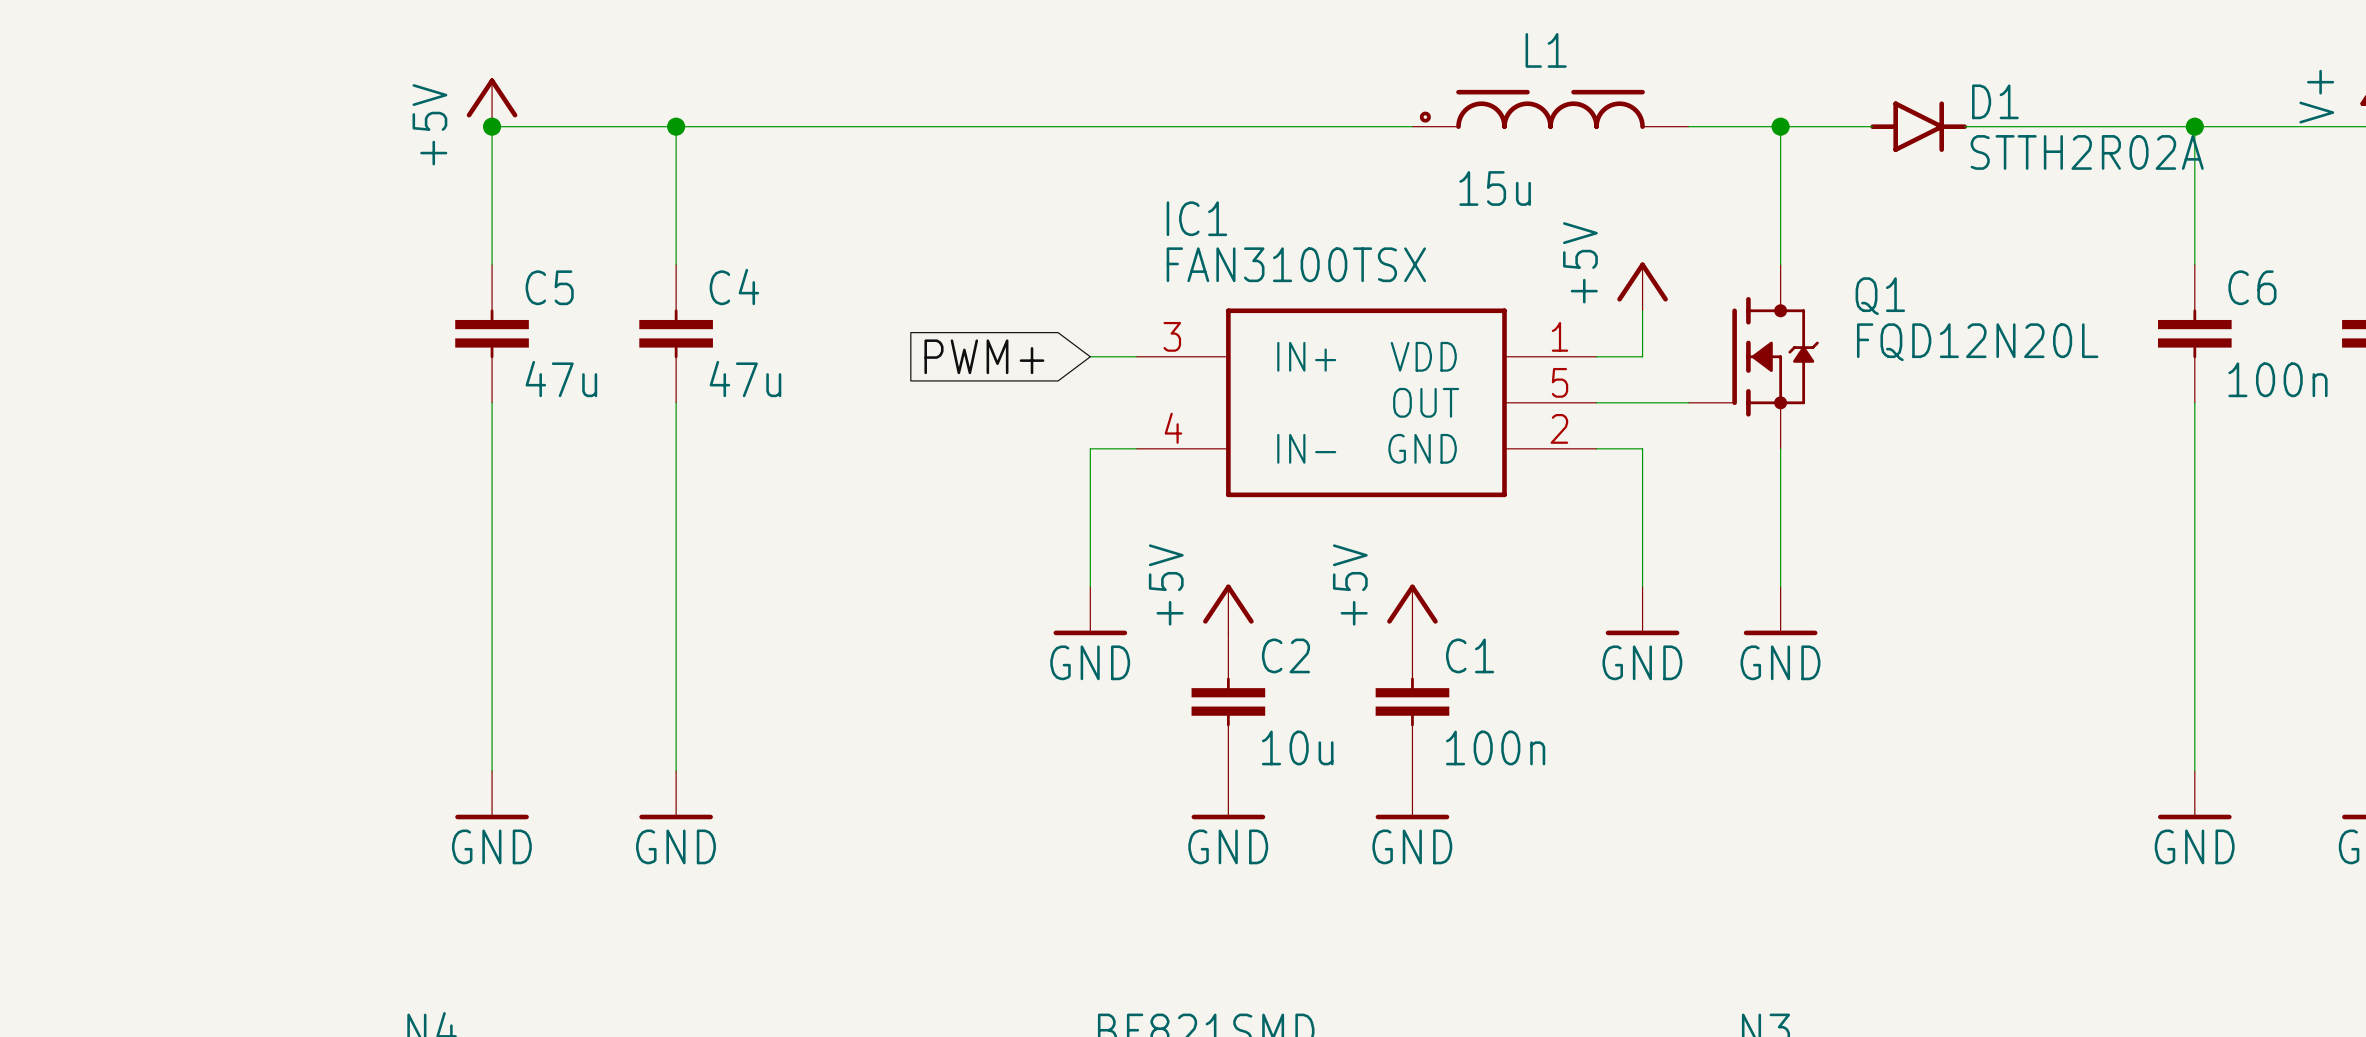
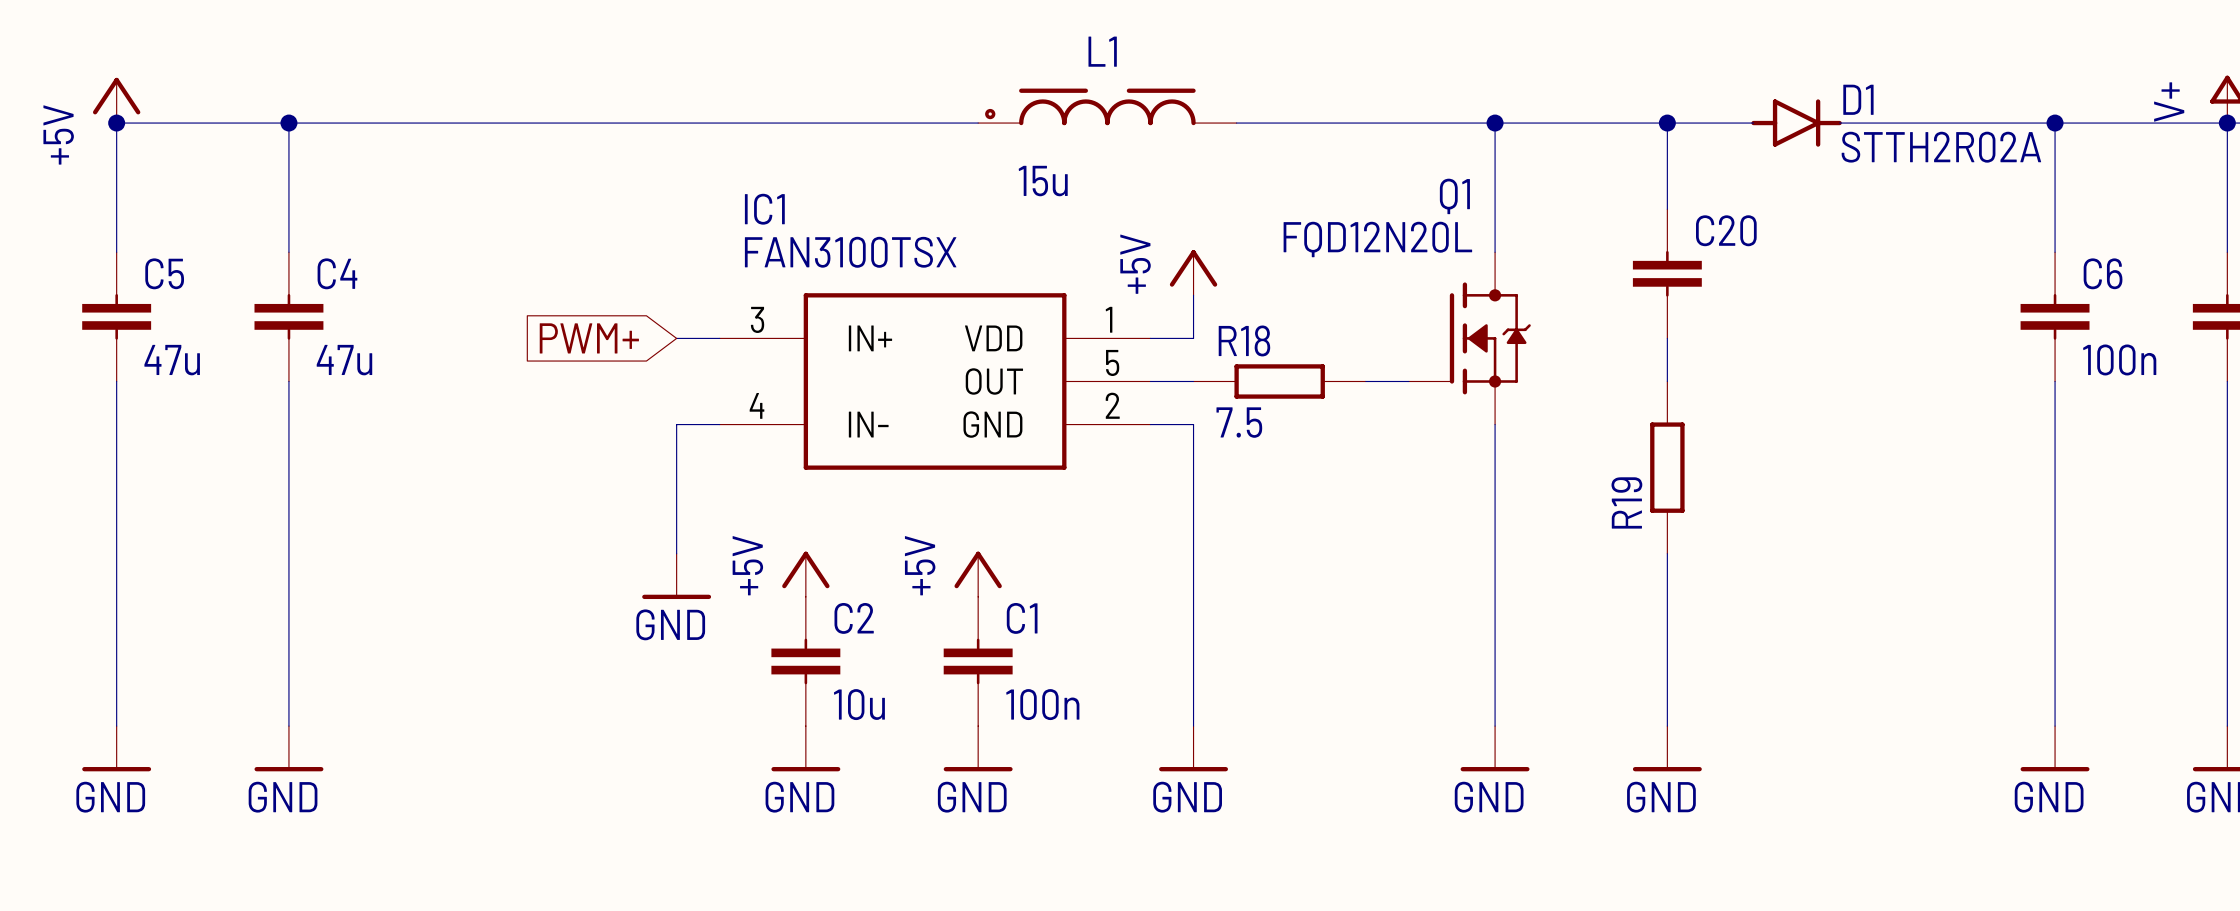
power symbol: none -> +5V (116, 100)
power symbol: +5V (492, 102) -> none
L1 position: (1550, 109) -> (1107, 106)
junction: none -> (116, 123)
junction: none -> (288, 123)
wire: (492, 126) (492, 264) -> (461, 123) (116, 123) (116, 252)
junction: (492, 126) -> none
wire: (676, 126) (676, 264) -> (288, 123) (288, 252)
junction: (676, 126) -> none
wire: (1044, 126) (1320, 126) -> (1322, 123) (1581, 123)
wire: none -> (1495, 123) (1495, 252)
junction: none -> (1495, 123)
power symbol: none -> +5V (1193, 272)
power symbol: +5V (1642, 286) -> none
C20: none -> (1667, 273)
Q1 name position: Q1 (1880, 296) -> Q1 (1454, 196)
wire: (1642, 310) (1642, 356) (1596, 356) -> (1193, 295) (1193, 338) (1150, 338)
C5 position: (492, 333) -> (116, 316)
C4 position: (676, 333) -> (288, 316)
Q1 value position: FQD12N20L (1977, 342) -> FQD12N20L (1377, 239)
global label position: PWM+ (984, 356) -> PWM+ (589, 338)
wire: (1090, 356) (1136, 356) -> (676, 338) (719, 338)
Q1 position: (1753, 356) -> (1469, 338)
wire: (492, 402) (492, 770) -> (116, 381) (116, 726)
wire: (676, 402) (676, 770) -> (288, 381) (288, 726)
wire: none -> (1150, 381) (1193, 381)
IC1 position: (1366, 402) -> (935, 381)
R18: none -> 7.5 (1279, 381)
wire: none -> (1365, 381) (1408, 381)
wire: (1596, 402) (1688, 402) -> none
wire: (1136, 448) (1090, 448) (1090, 586) -> (719, 424) (676, 424) (676, 553)
wire: none -> (1150, 424) (1193, 424) (1193, 726)
wire: (1596, 448) (1642, 448) (1642, 586) -> (1495, 424) (1495, 726)
wire: (1780, 448) (1780, 586) -> (1667, 726) (1667, 553)
R19: none -> (1667, 467)
power symbol: none -> +5V (805, 574)
power symbol: none -> +5V (978, 574)
power symbol: +5V (1228, 608) -> none
power symbol: +5V (1412, 608) -> none
power symbol: none -> GND (676, 576)
power symbol: GND (1090, 611) -> none
power symbol: GND (1642, 611) -> none
power symbol: GND (1780, 611) -> none
C2 position: (1228, 701) -> (805, 661)
C1 position: (1412, 701) -> (978, 661)
power symbol: none -> GND (116, 748)
power symbol: none -> GND (288, 748)
power symbol: GND (492, 795) -> none
power symbol: GND (676, 795) -> none
power symbol: none -> GND (805, 748)
power symbol: none -> GND (978, 748)
power symbol position: GND (1228, 795) -> GND (1193, 748)
power symbol: GND (1412, 795) -> none
power symbol: none -> GND (1495, 748)
power symbol: none -> GND (1667, 748)

